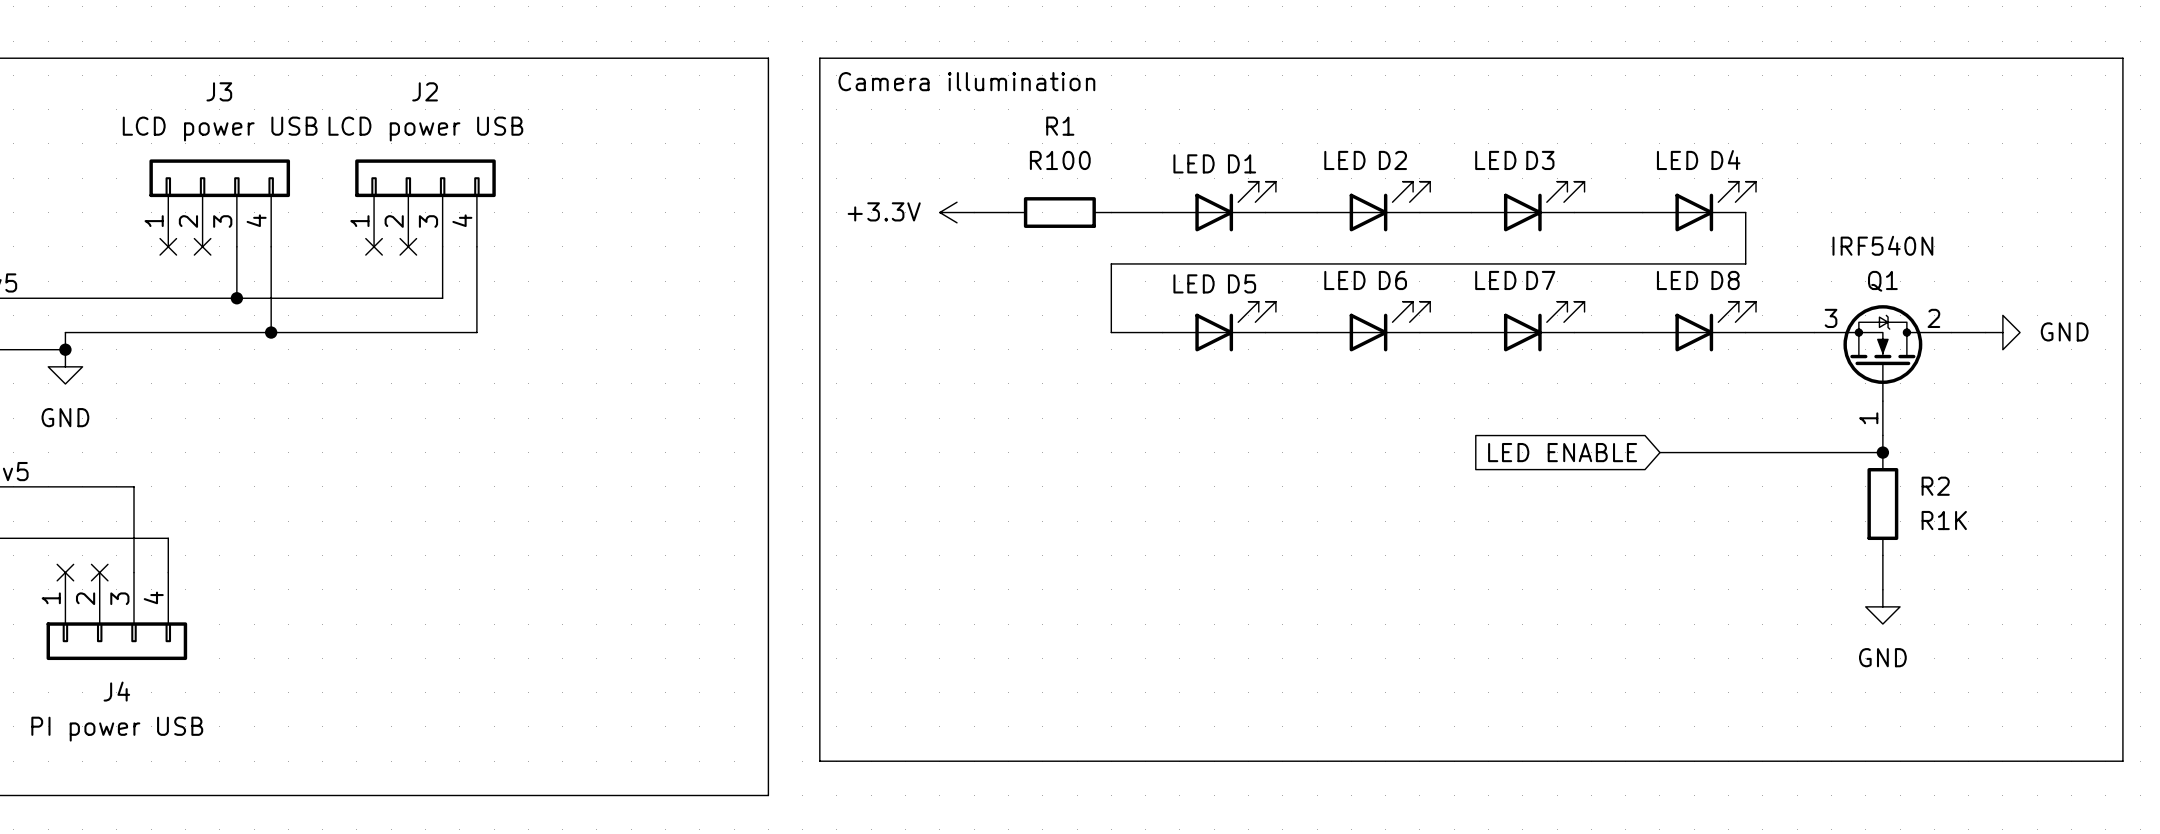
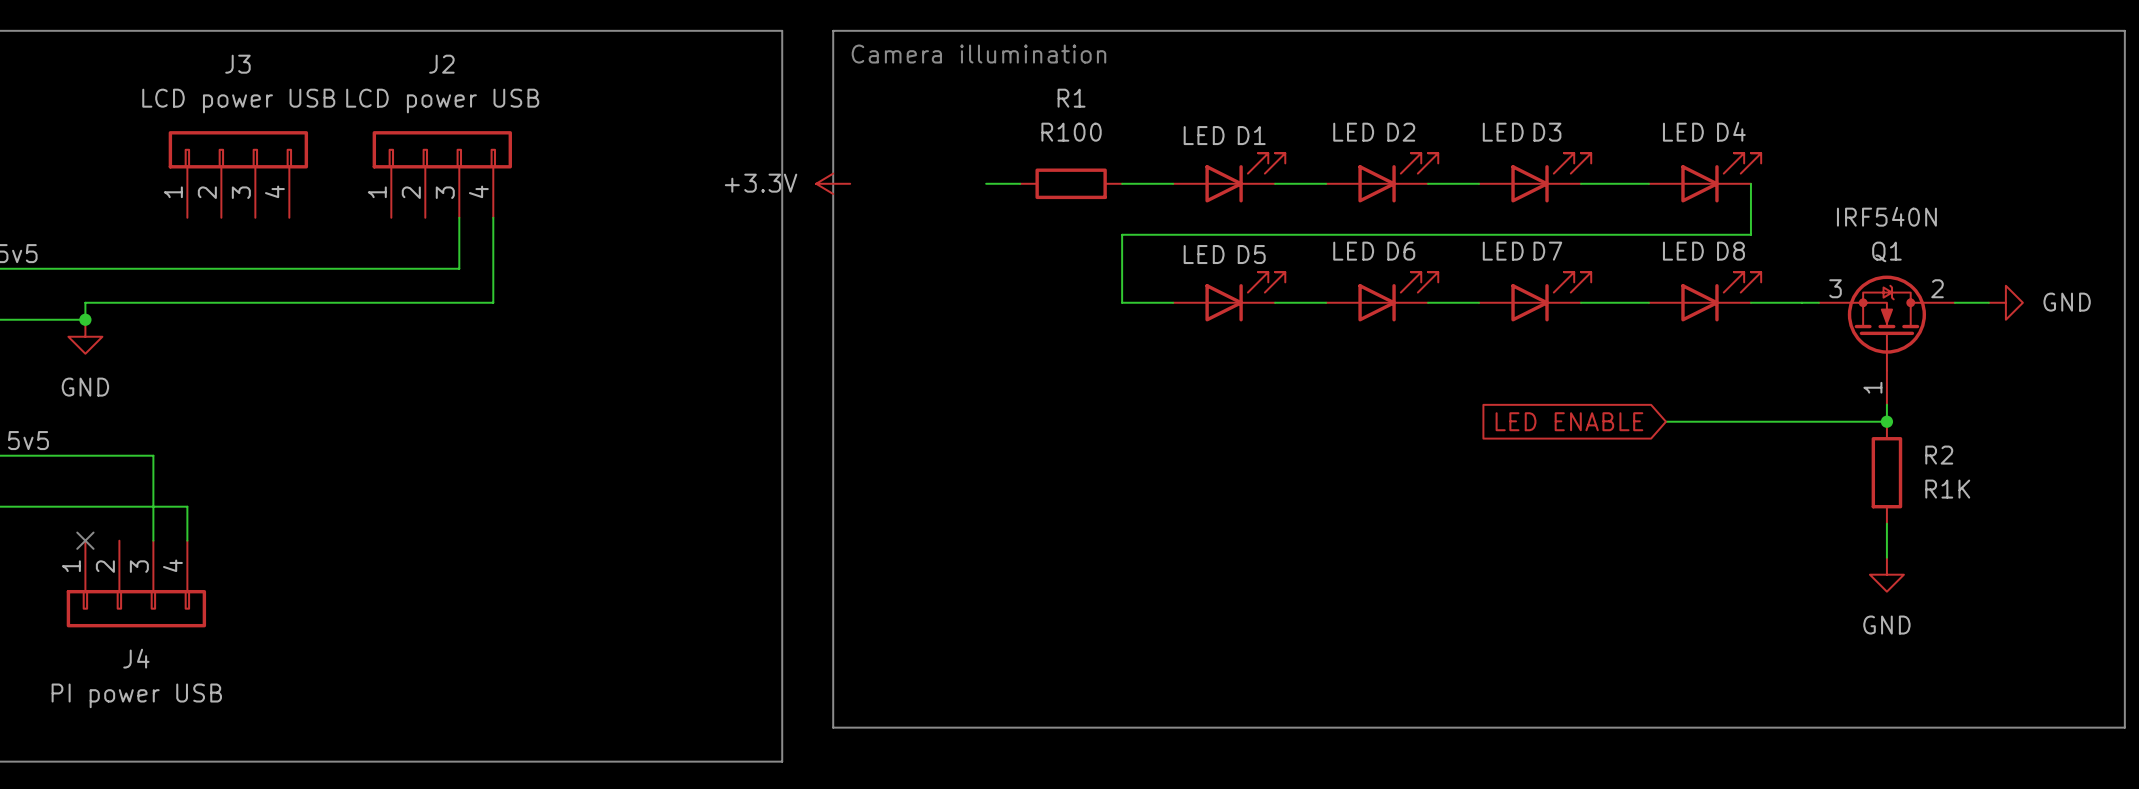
power symbol position: +3.3V (957, 212) -> +3.3V (833, 183)
no-connect mark: (168, 246) -> none
no-connect mark: (202, 246) -> none
wire: (236, 246) (236, 298) -> none
wire: (271, 246) (271, 332) -> none
no-connect mark: (374, 246) -> none
no-connect mark: (408, 246) -> none
junction: (236, 298) -> none
junction: (271, 332) -> none
no-connect mark: (99, 572) -> none

